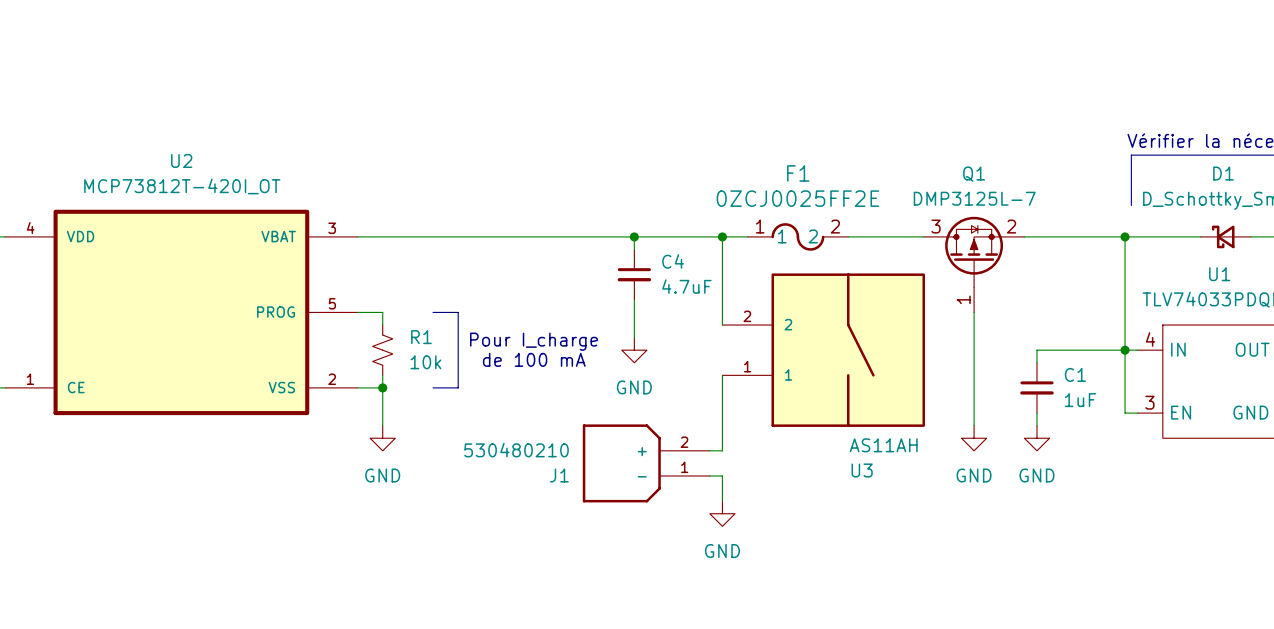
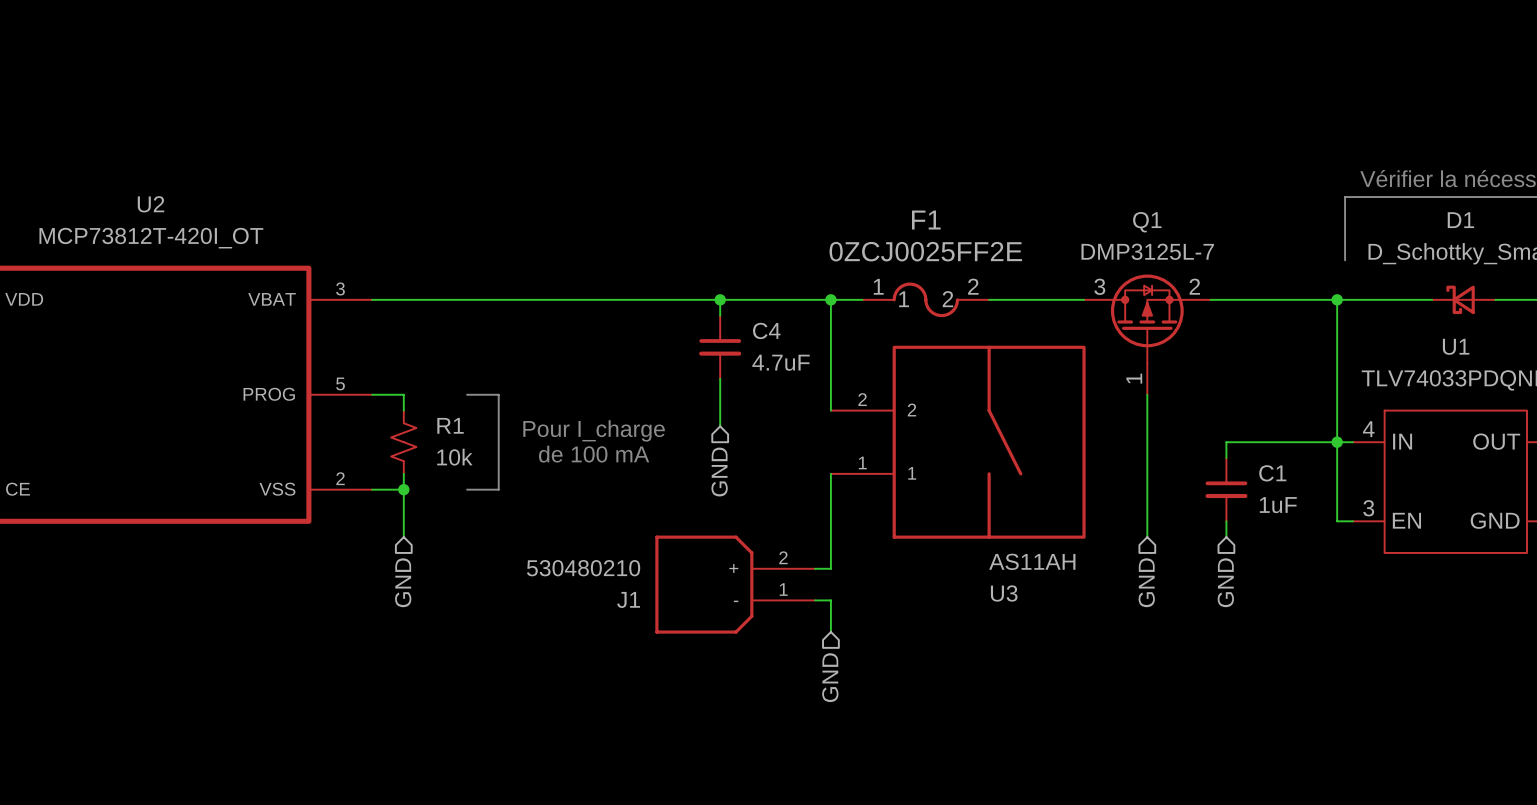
power symbol: GND (634, 350) -> none
hierarchical label: none -> GND (719, 472)
power symbol: GND (382, 438) -> none
power symbol: GND (974, 438) -> none
power symbol: GND (1036, 438) -> none
hierarchical label: none -> GND (403, 582)
hierarchical label: none -> GND (1146, 582)
hierarchical label: none -> GND (1225, 582)
power symbol: GND (722, 513) -> none
hierarchical label: none -> GND (830, 677)

